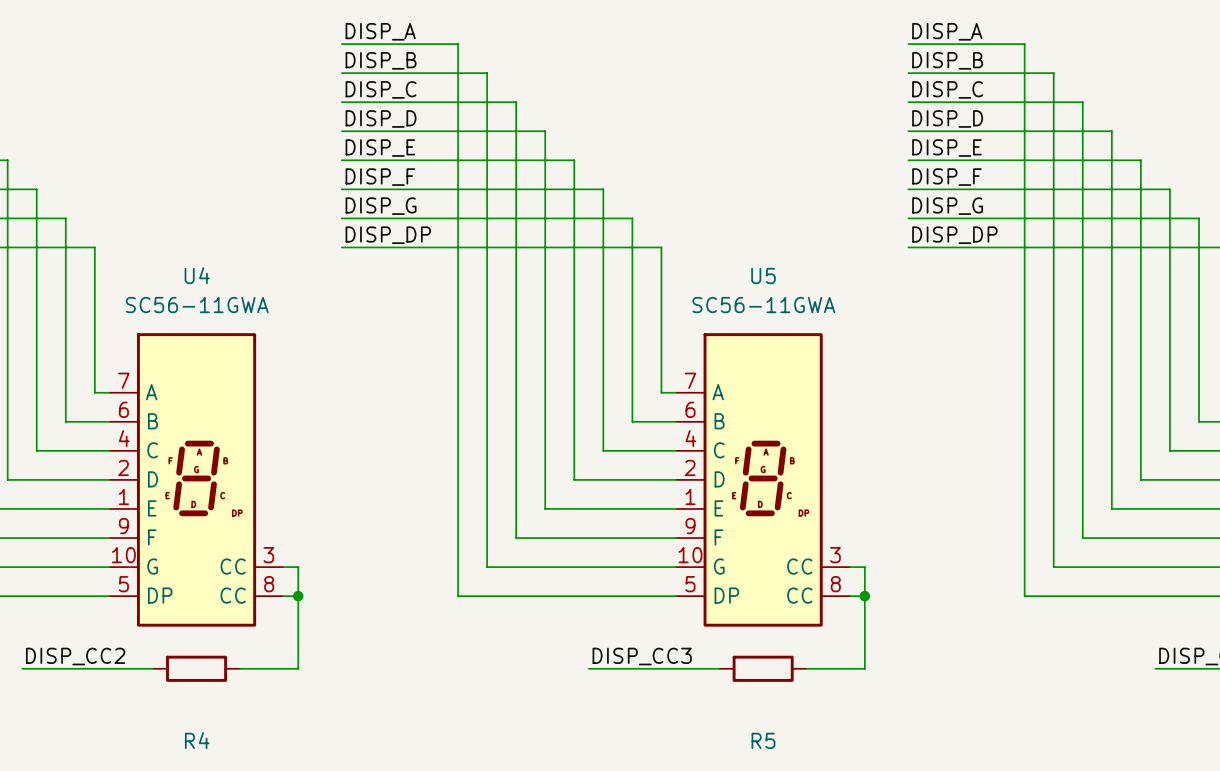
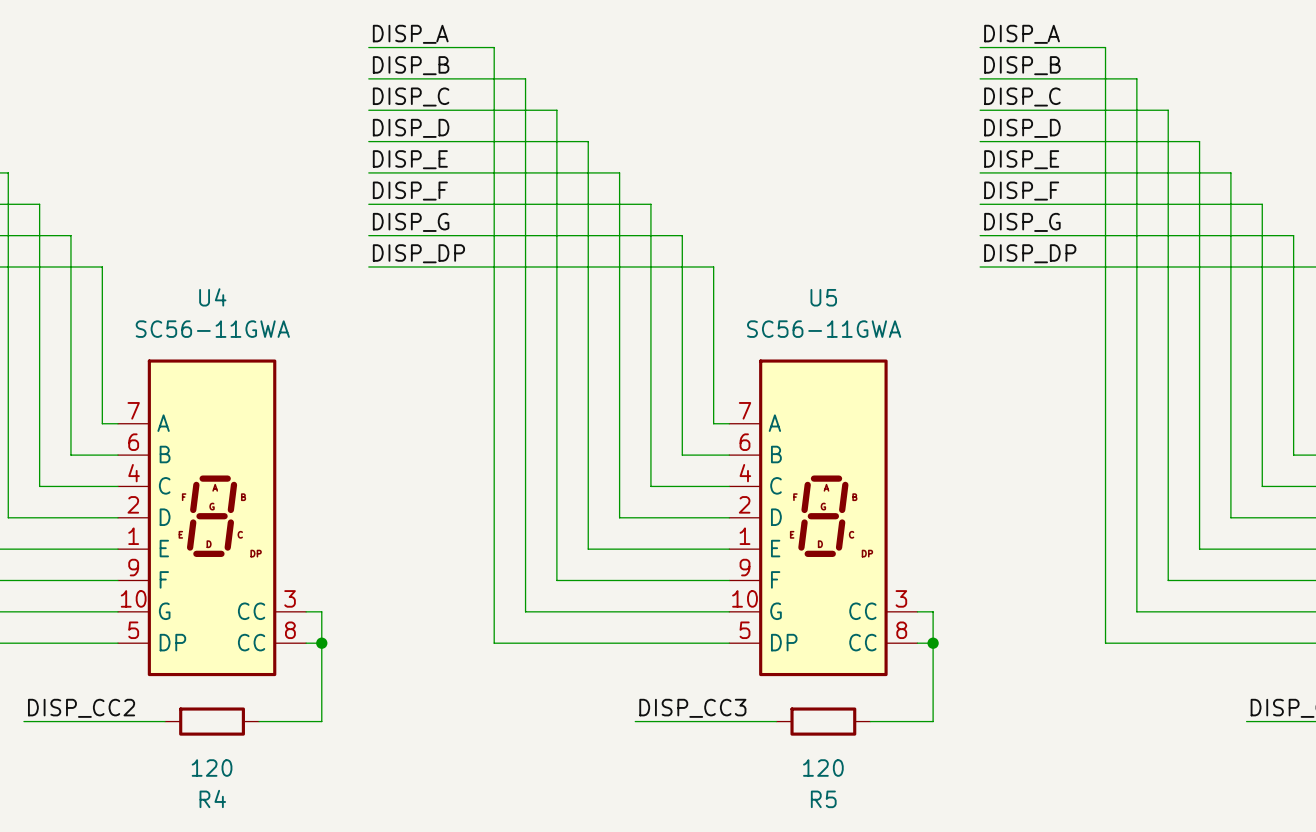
R4 value: none -> 120 (212, 768)
R5 value: none -> 120 (823, 768)

